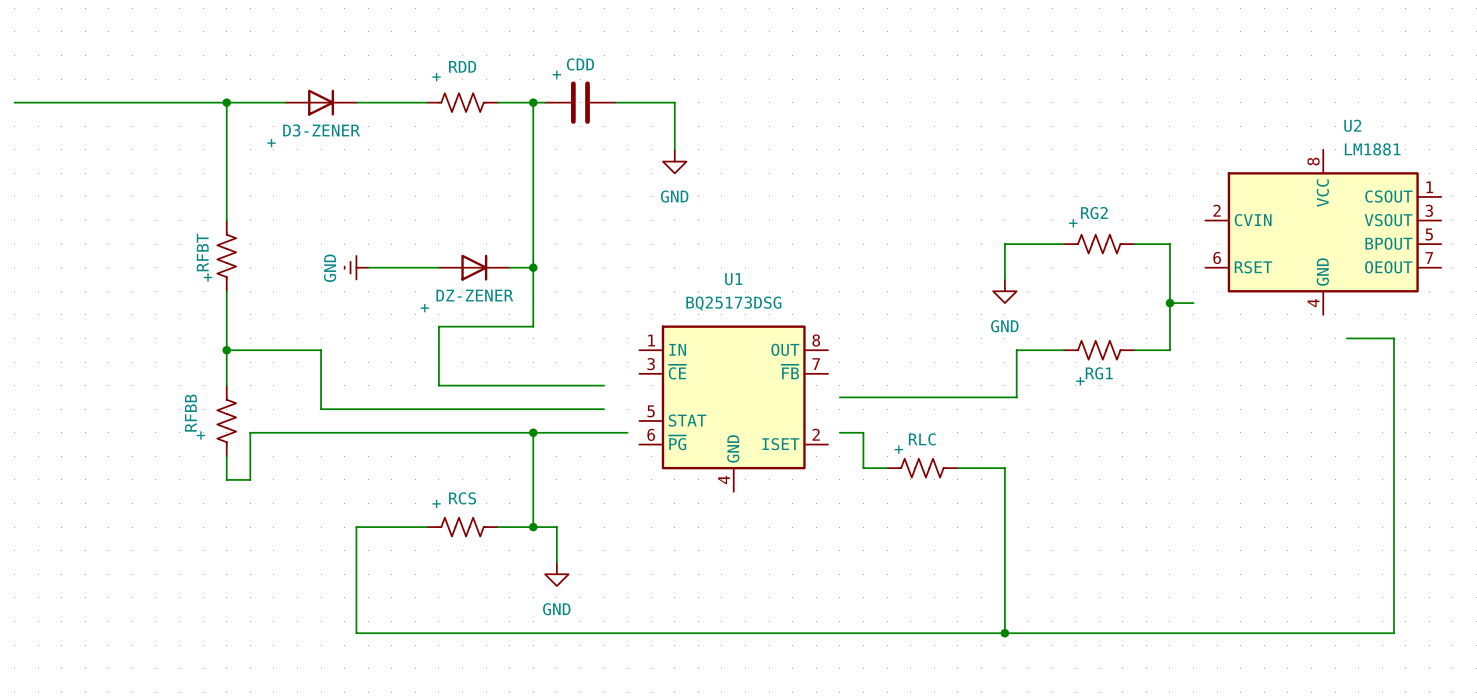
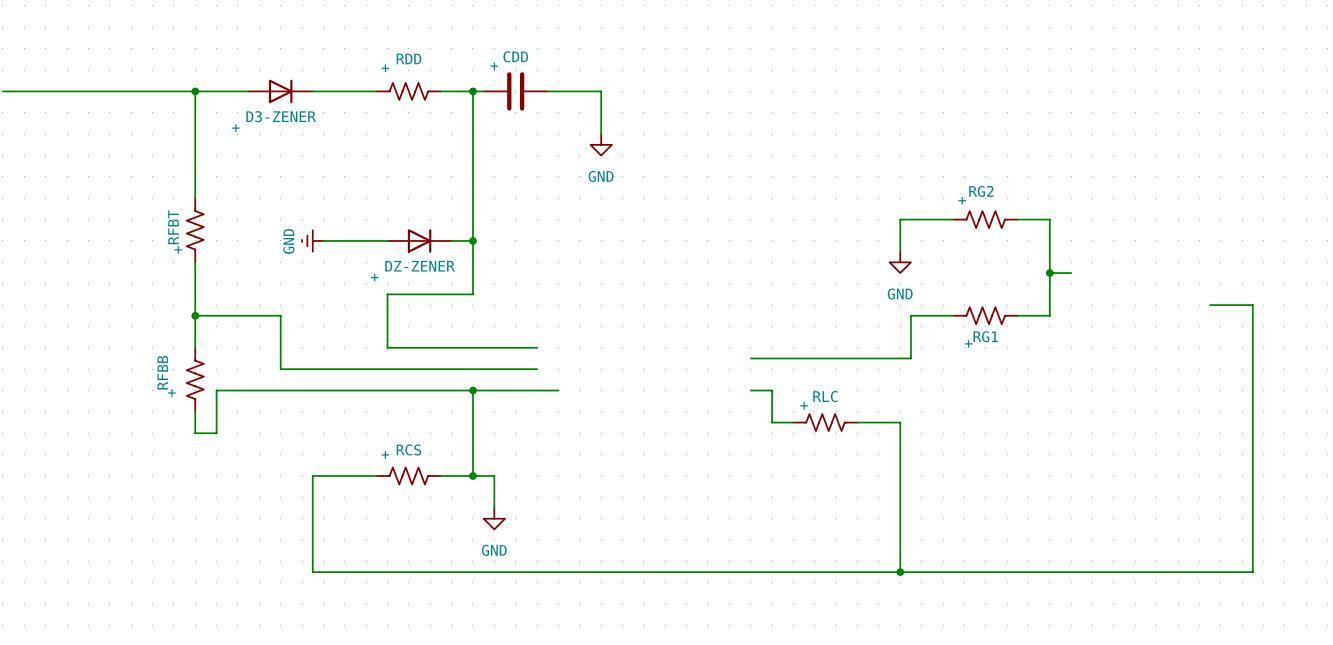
U2: LM1881 (1323, 232) -> none
U1: BQ25173DSG (733, 408) -> none

